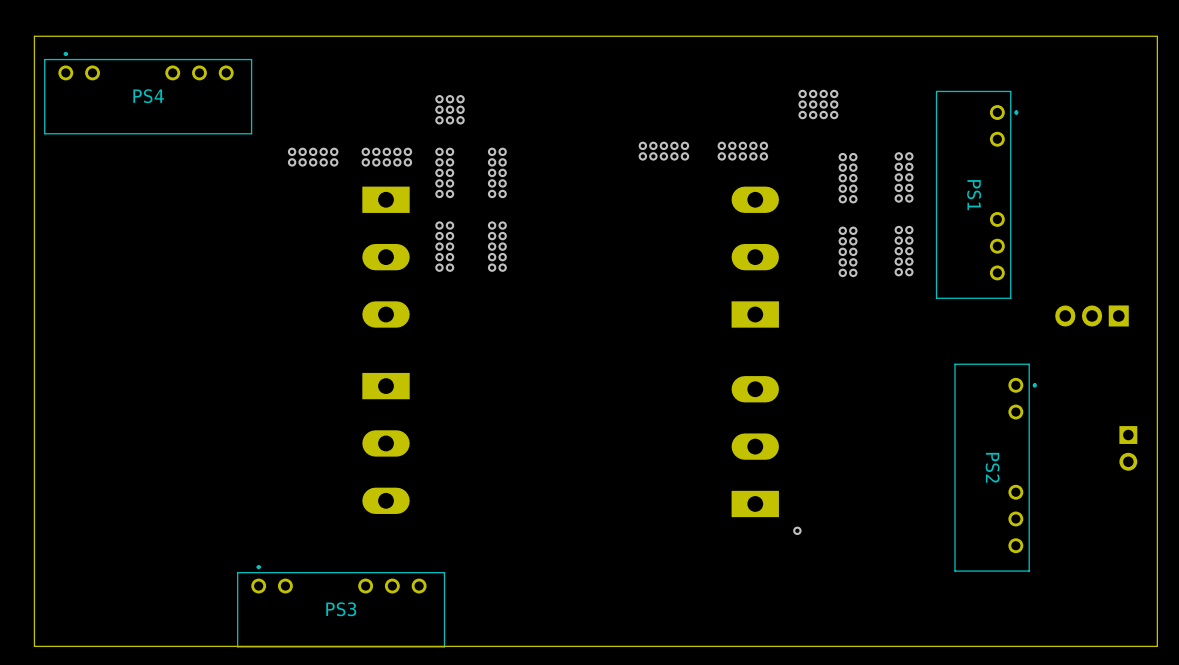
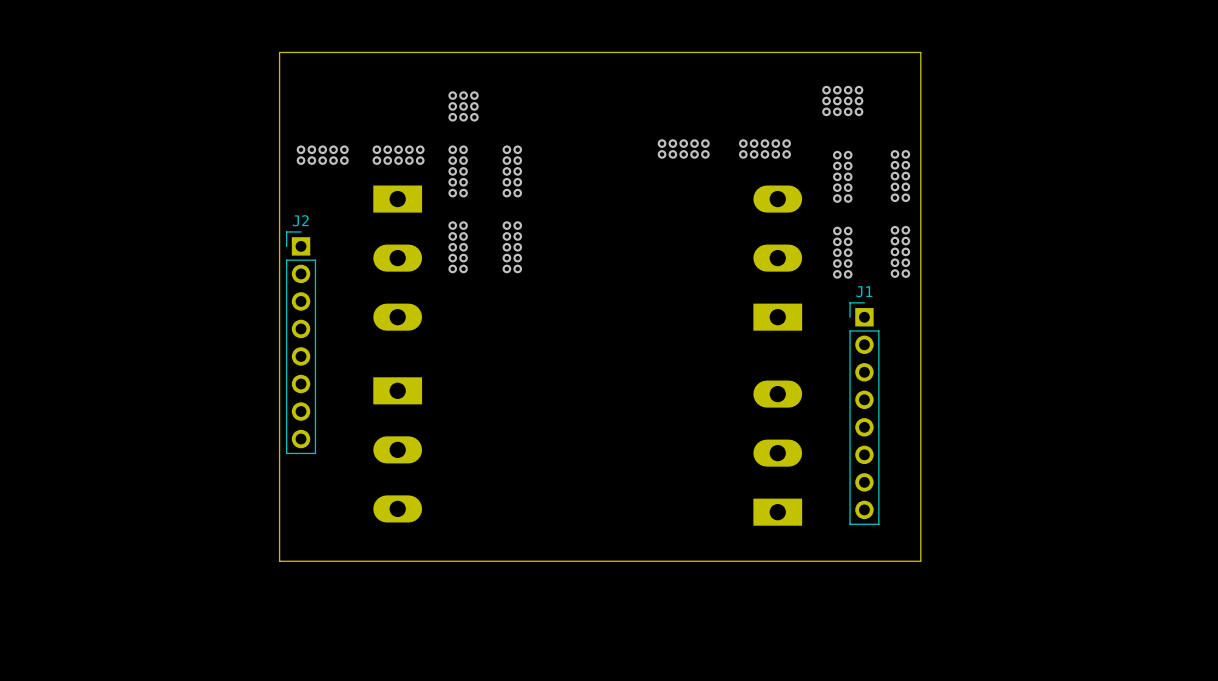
board edge: (1157, 36) (34, 36) (34, 646) (1157, 646) (1157, 36) -> none
board edge: none -> (920, 52) (279, 52) (279, 561) (920, 561) (920, 52)
PS4: (148, 93) -> none
via: none -> (894, 154)
via: none -> (905, 154)
via: (898, 156) -> none
via: (909, 156) -> none
via: none -> (837, 155)
via: none -> (848, 155)
via: (842, 157) -> none
via: (853, 157) -> none
via: none -> (894, 165)
via: none -> (905, 165)
via: (898, 166) -> none
via: (909, 166) -> none
via: none -> (837, 166)
via: none -> (848, 166)
via: (842, 167) -> none
via: (853, 167) -> none
via: none -> (894, 176)
via: none -> (905, 176)
via: (898, 177) -> none
via: (909, 177) -> none
via: none -> (837, 176)
via: none -> (848, 176)
via: (842, 178) -> none
via: (853, 178) -> none
via: none -> (894, 186)
via: none -> (905, 186)
via: (898, 187) -> none
via: (909, 187) -> none
via: none -> (837, 187)
via: none -> (848, 187)
via: (842, 188) -> none
via: (853, 188) -> none
PS1: (977, 194) -> none
via: none -> (894, 197)
via: none -> (905, 197)
via: (898, 198) -> none
via: (909, 198) -> none
via: none -> (837, 198)
via: none -> (848, 198)
via: (842, 199) -> none
via: (853, 199) -> none
via: none -> (837, 231)
via: none -> (848, 231)
via: (842, 230) -> none
via: (853, 230) -> none
via: none -> (894, 230)
via: none -> (905, 230)
via: (898, 230) -> none
via: (909, 230) -> none
via: none -> (894, 241)
via: none -> (905, 241)
via: (898, 240) -> none
via: (909, 240) -> none
via: none -> (837, 241)
via: none -> (848, 241)
via: (842, 241) -> none
via: (853, 241) -> none
via: none -> (837, 252)
via: none -> (848, 252)
via: (842, 251) -> none
via: (853, 251) -> none
via: none -> (894, 251)
via: none -> (905, 251)
via: (898, 251) -> none
via: (909, 251) -> none
via: none -> (894, 262)
via: none -> (905, 262)
via: (898, 261) -> none
via: (909, 261) -> none
via: none -> (837, 263)
via: none -> (848, 263)
via: (842, 262) -> none
via: (853, 262) -> none
via: none -> (837, 274)
via: none -> (848, 274)
via: (842, 272) -> none
via: (853, 272) -> none
via: none -> (894, 273)
via: none -> (905, 273)
via: (898, 272) -> none
via: (909, 272) -> none
part: (1092, 315) -> none
J2: none -> (301, 342)
J1: none -> (864, 413)
part: (1128, 448) -> none
PS2: (995, 467) -> none
via: (797, 530) -> none
PS3: (341, 606) -> none

